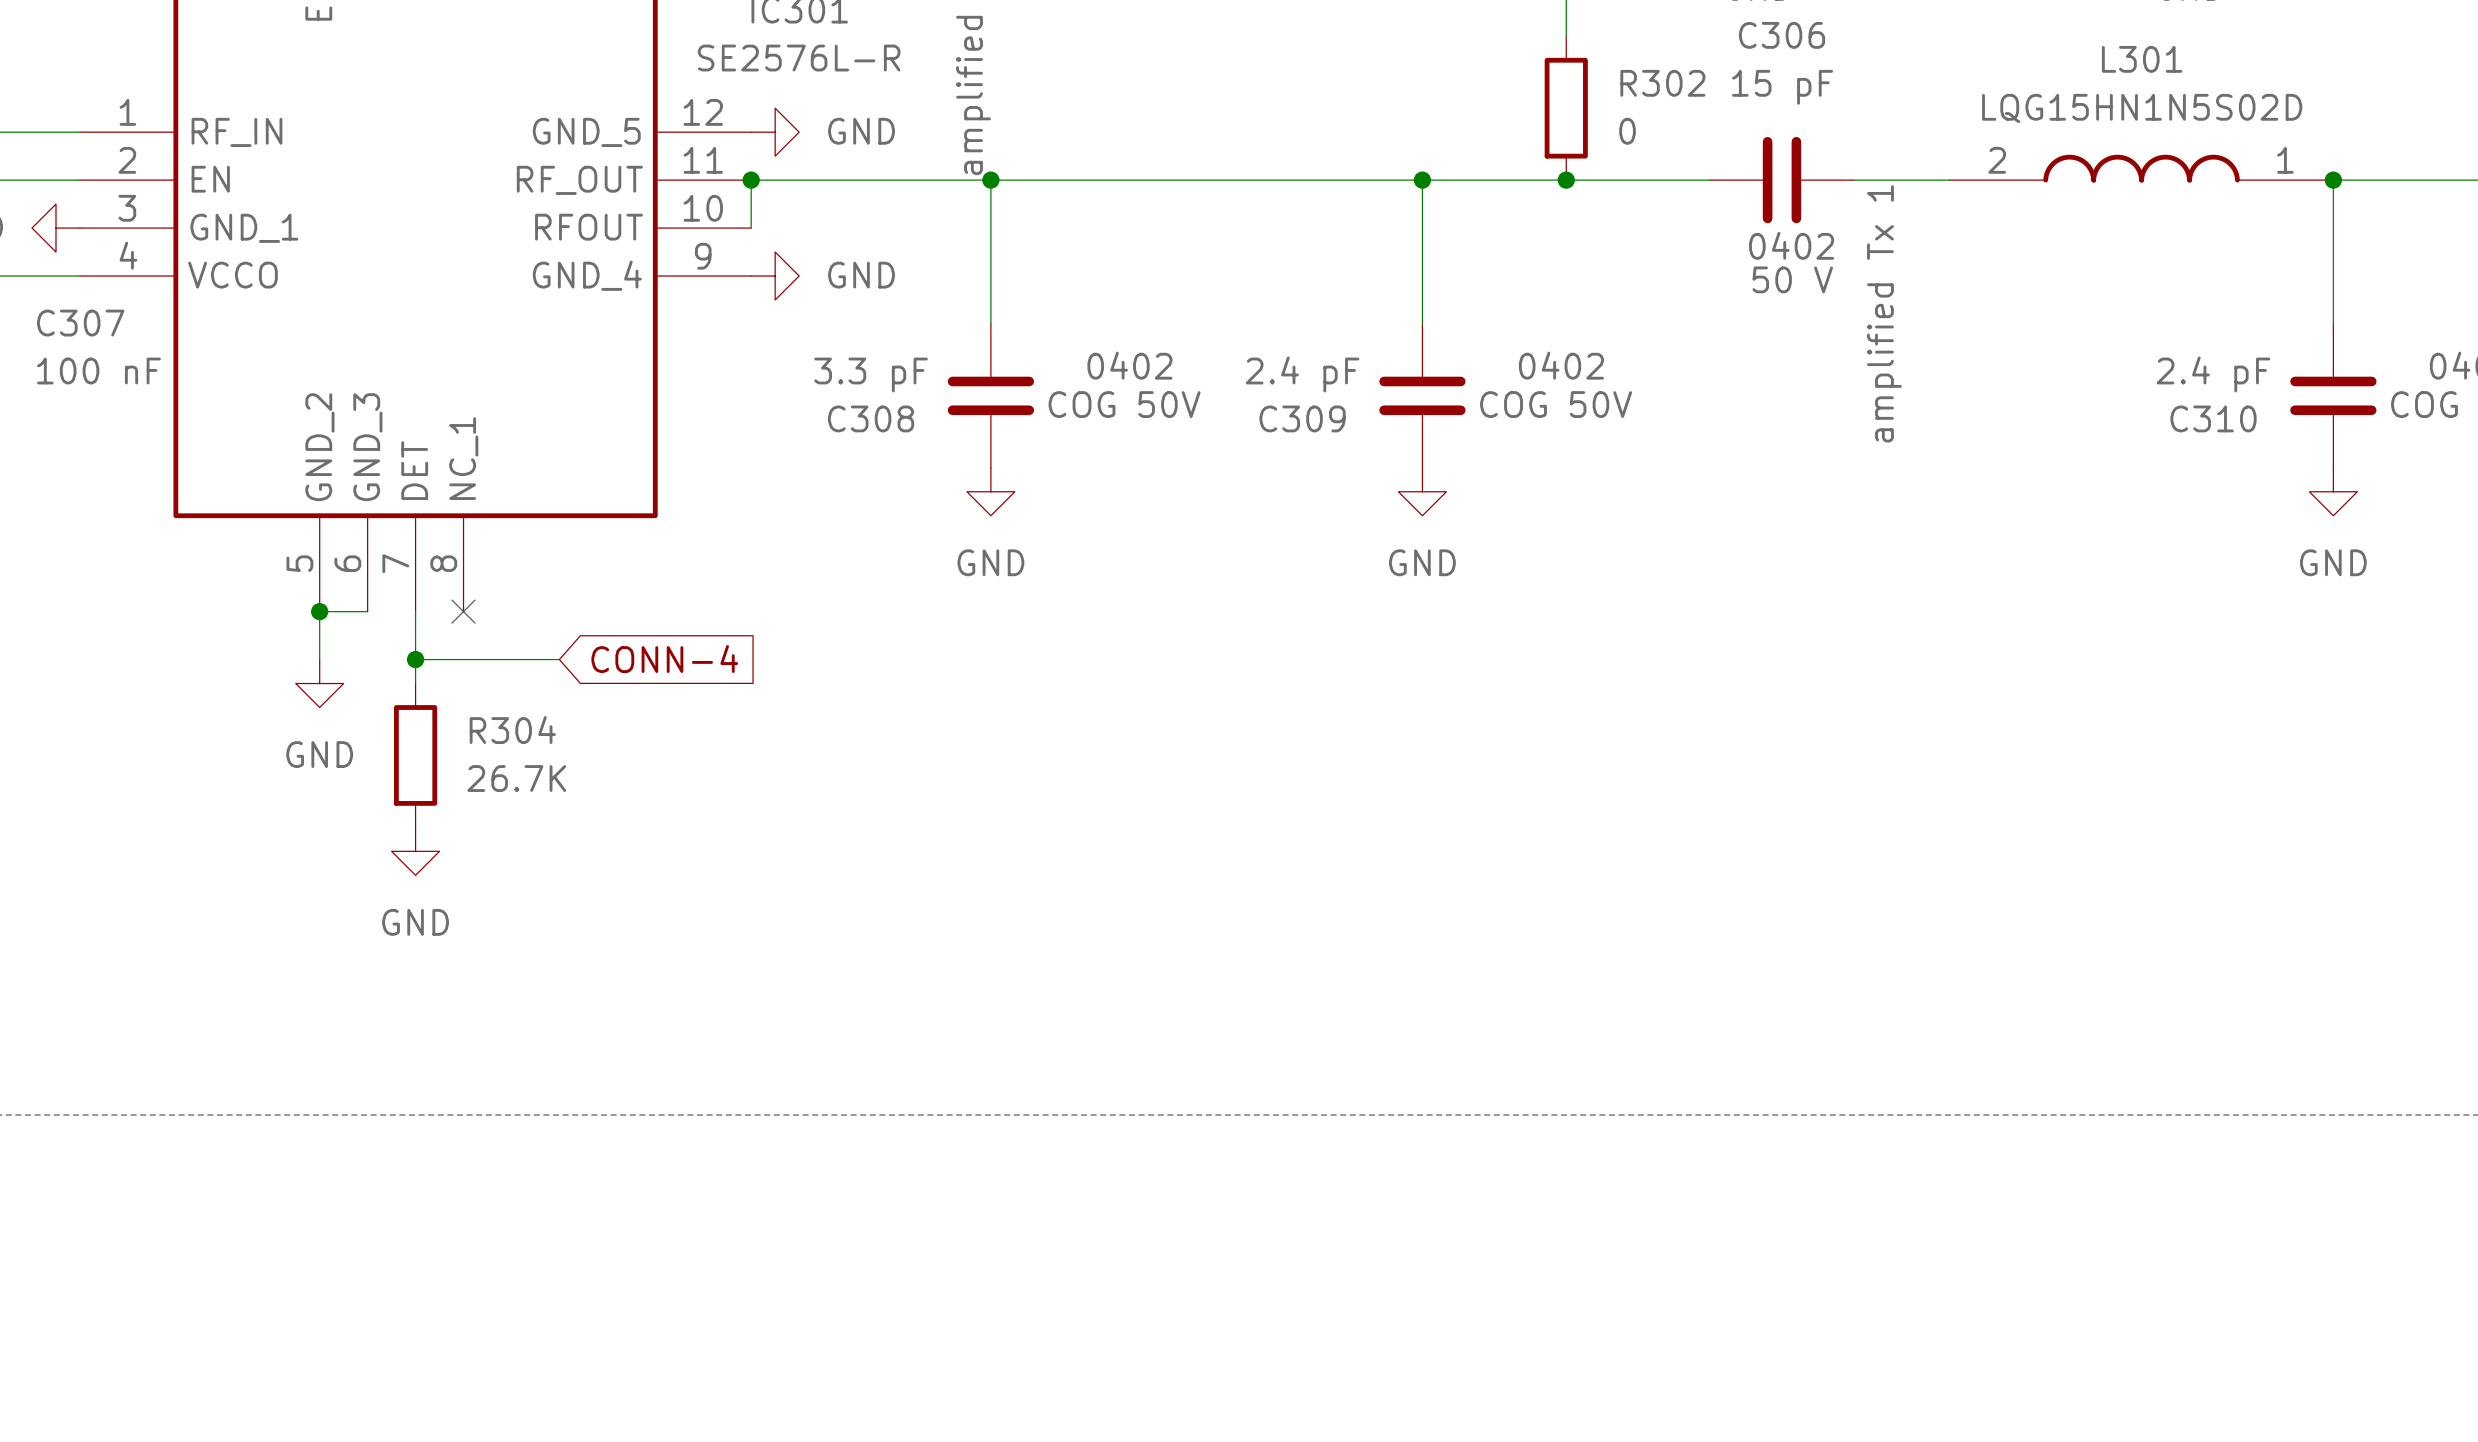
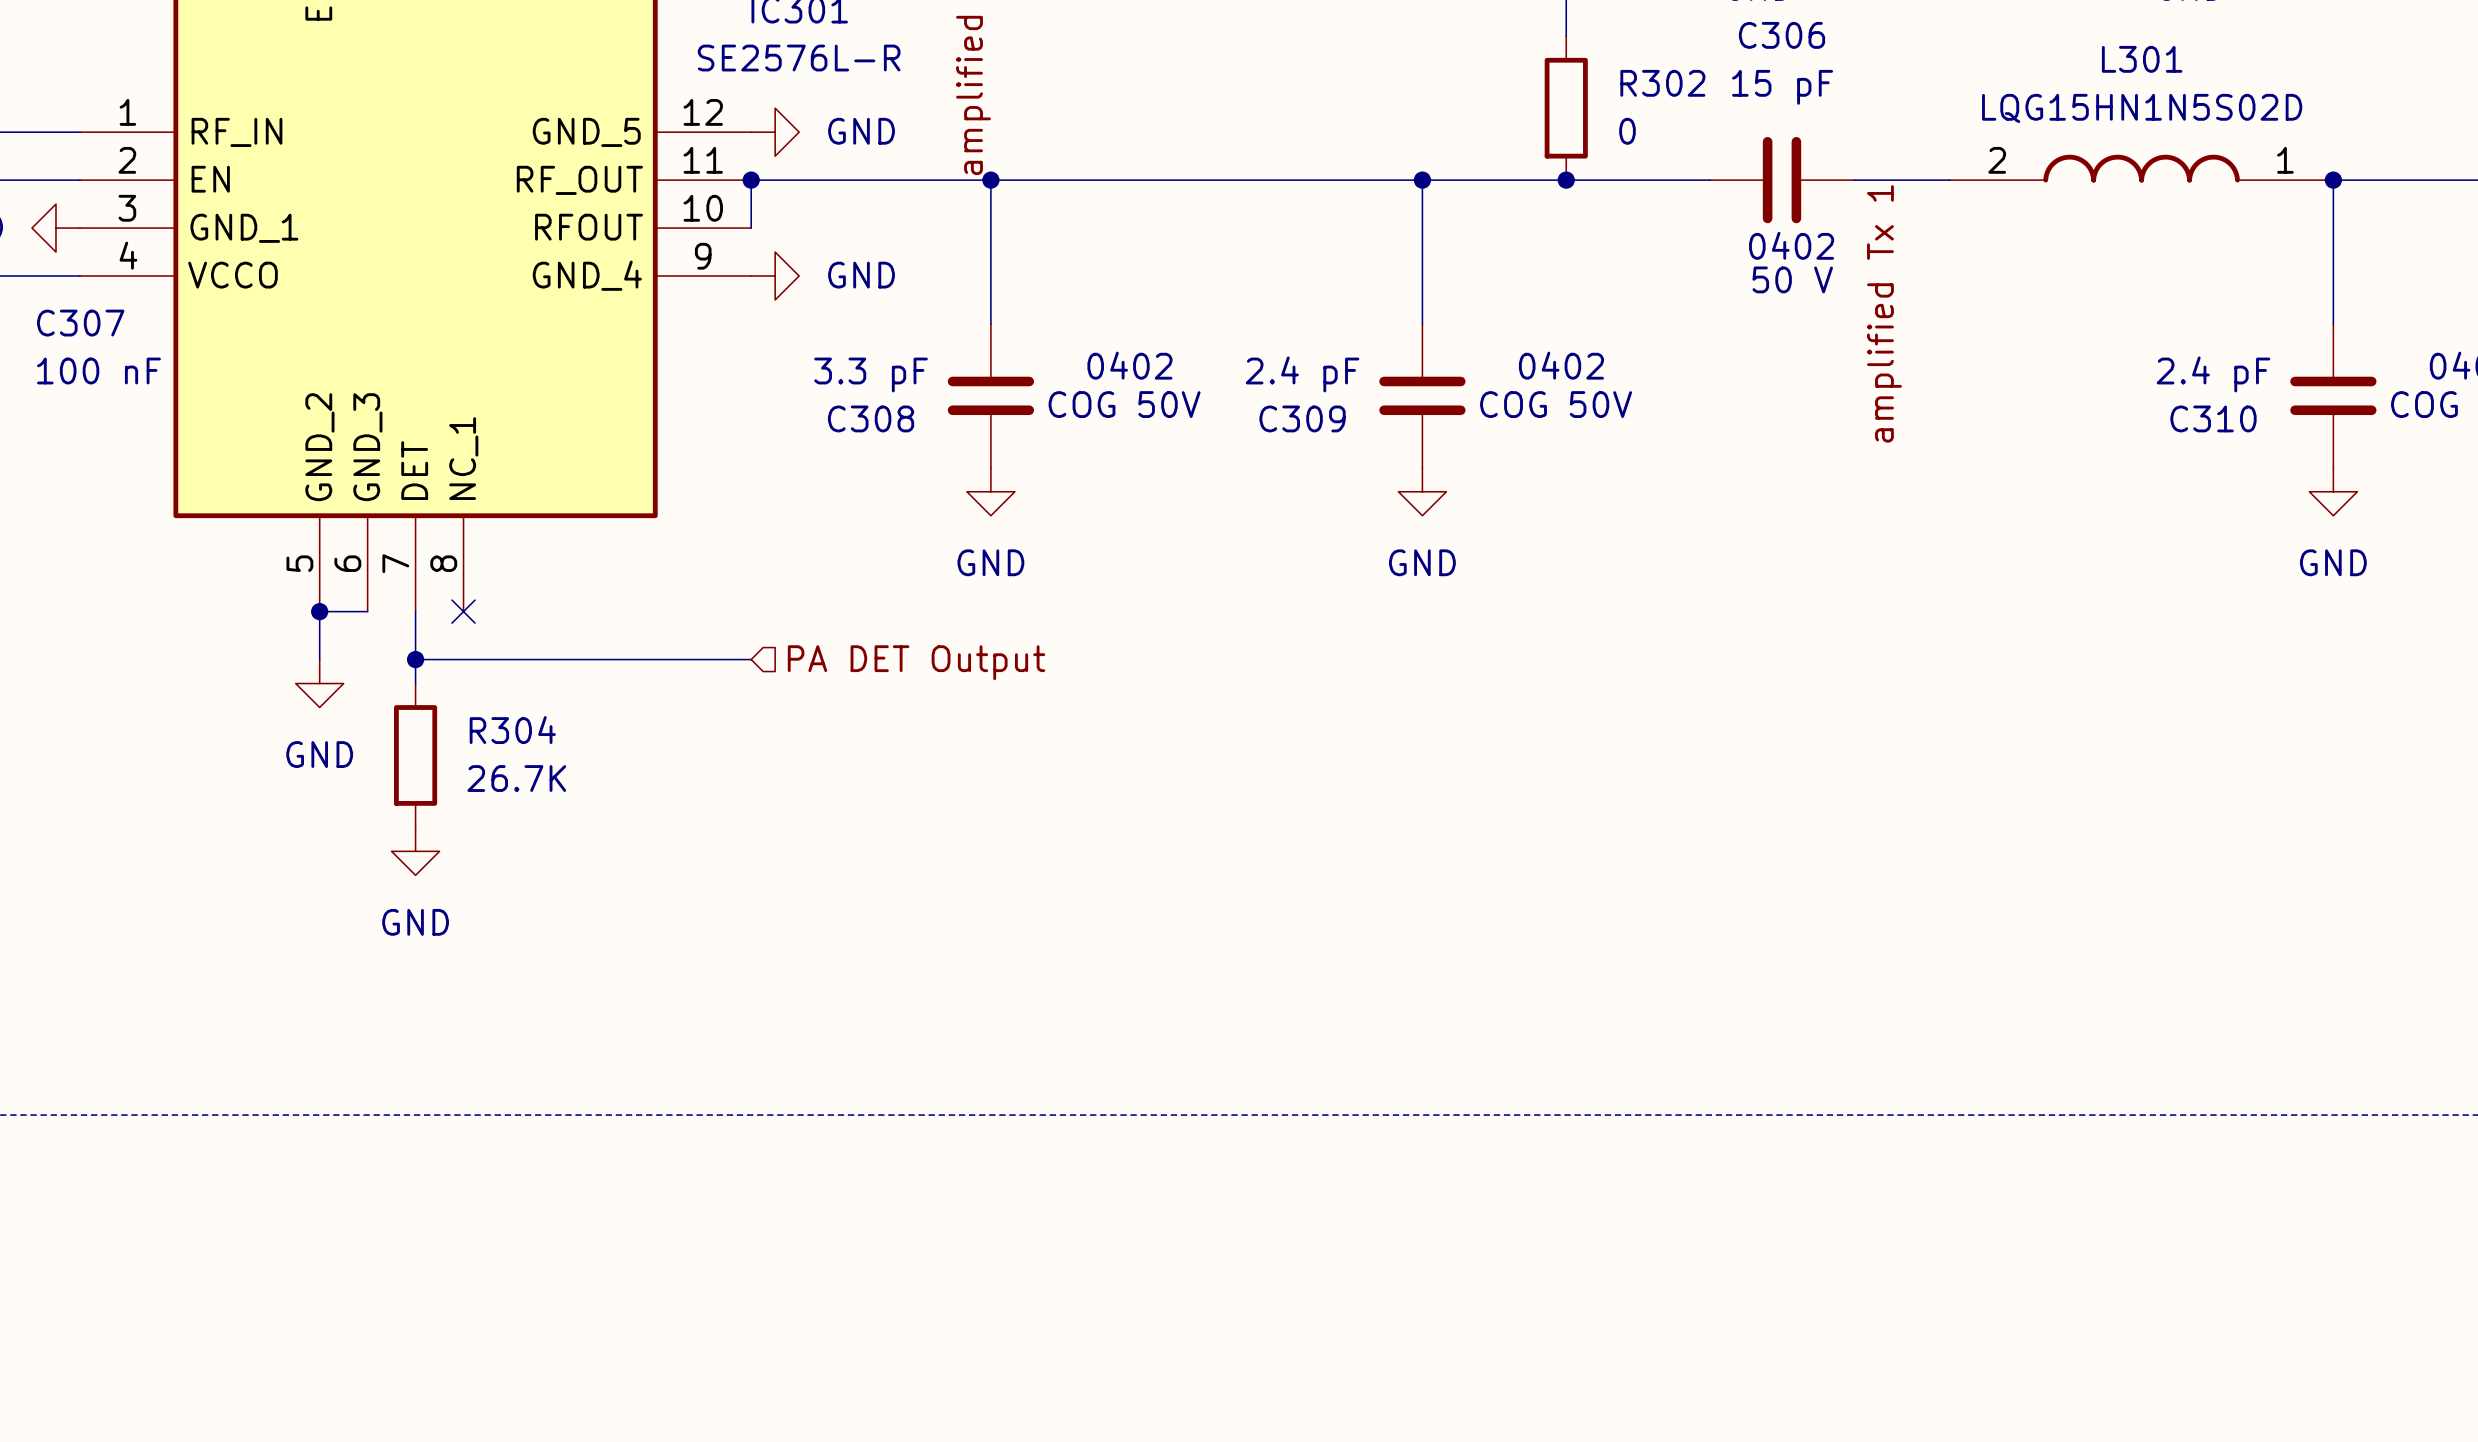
global label: CONN-4 (664, 658) -> none
wire: none -> (559, 659) (751, 659)
hierarchical label: none -> PA DET Output (916, 662)

